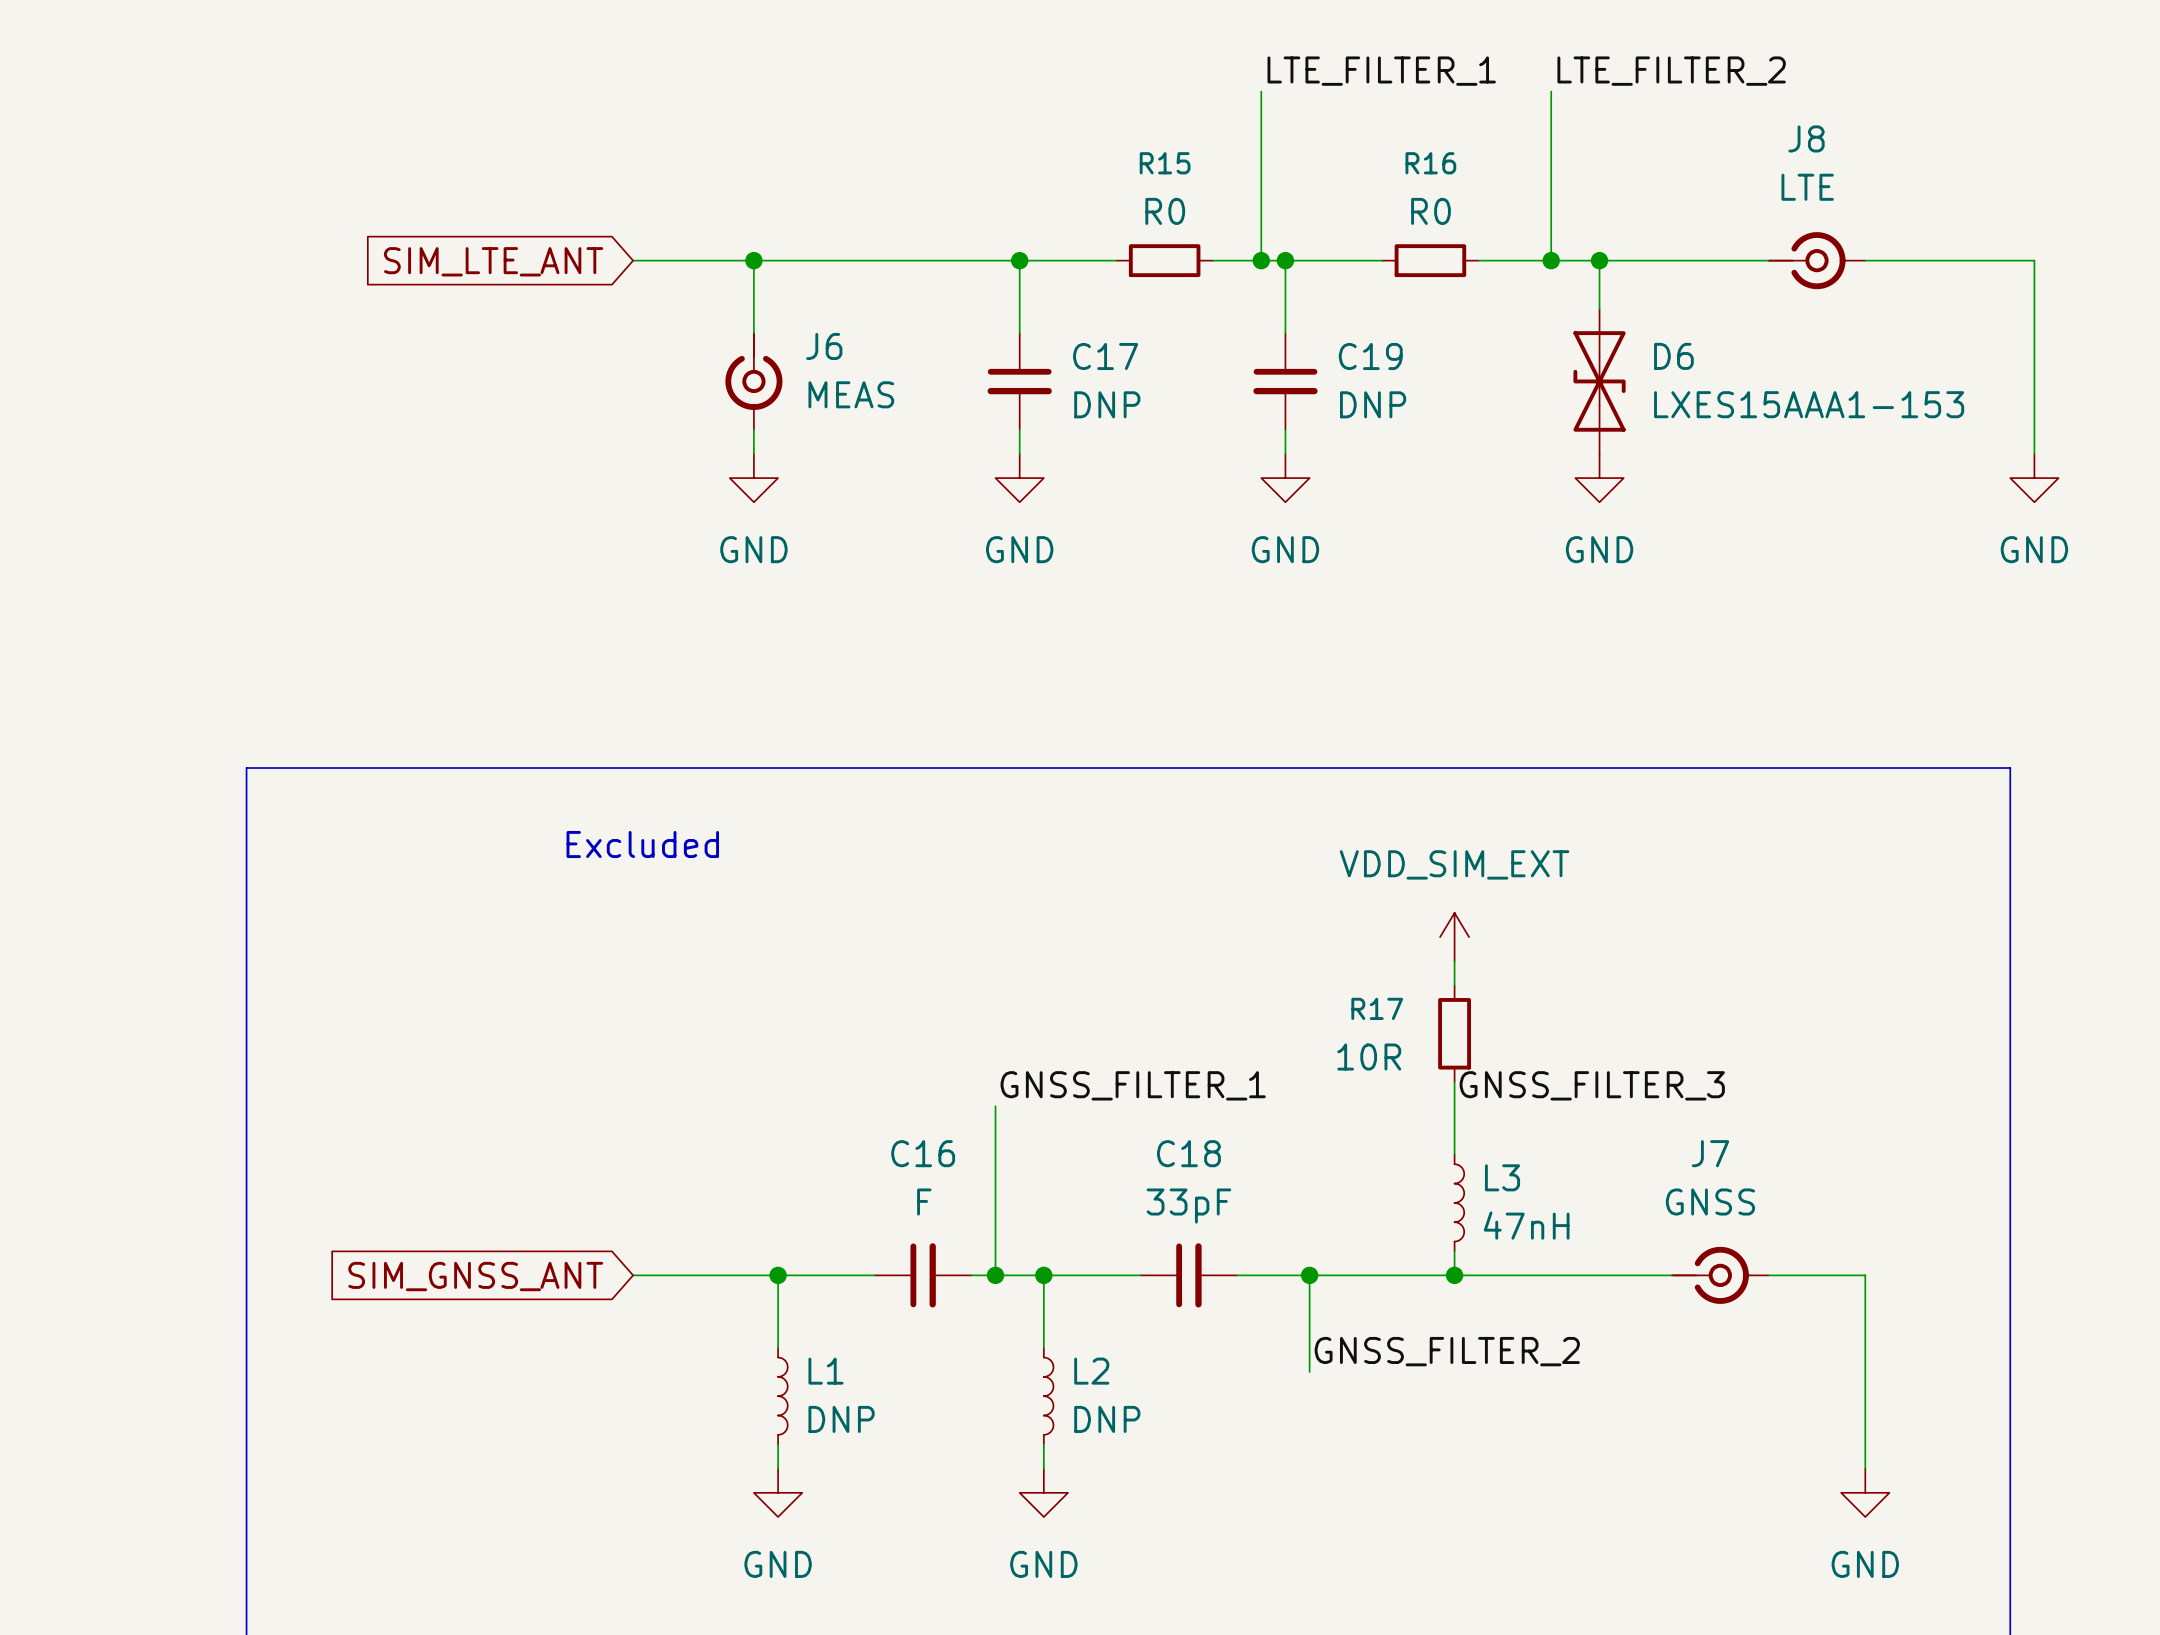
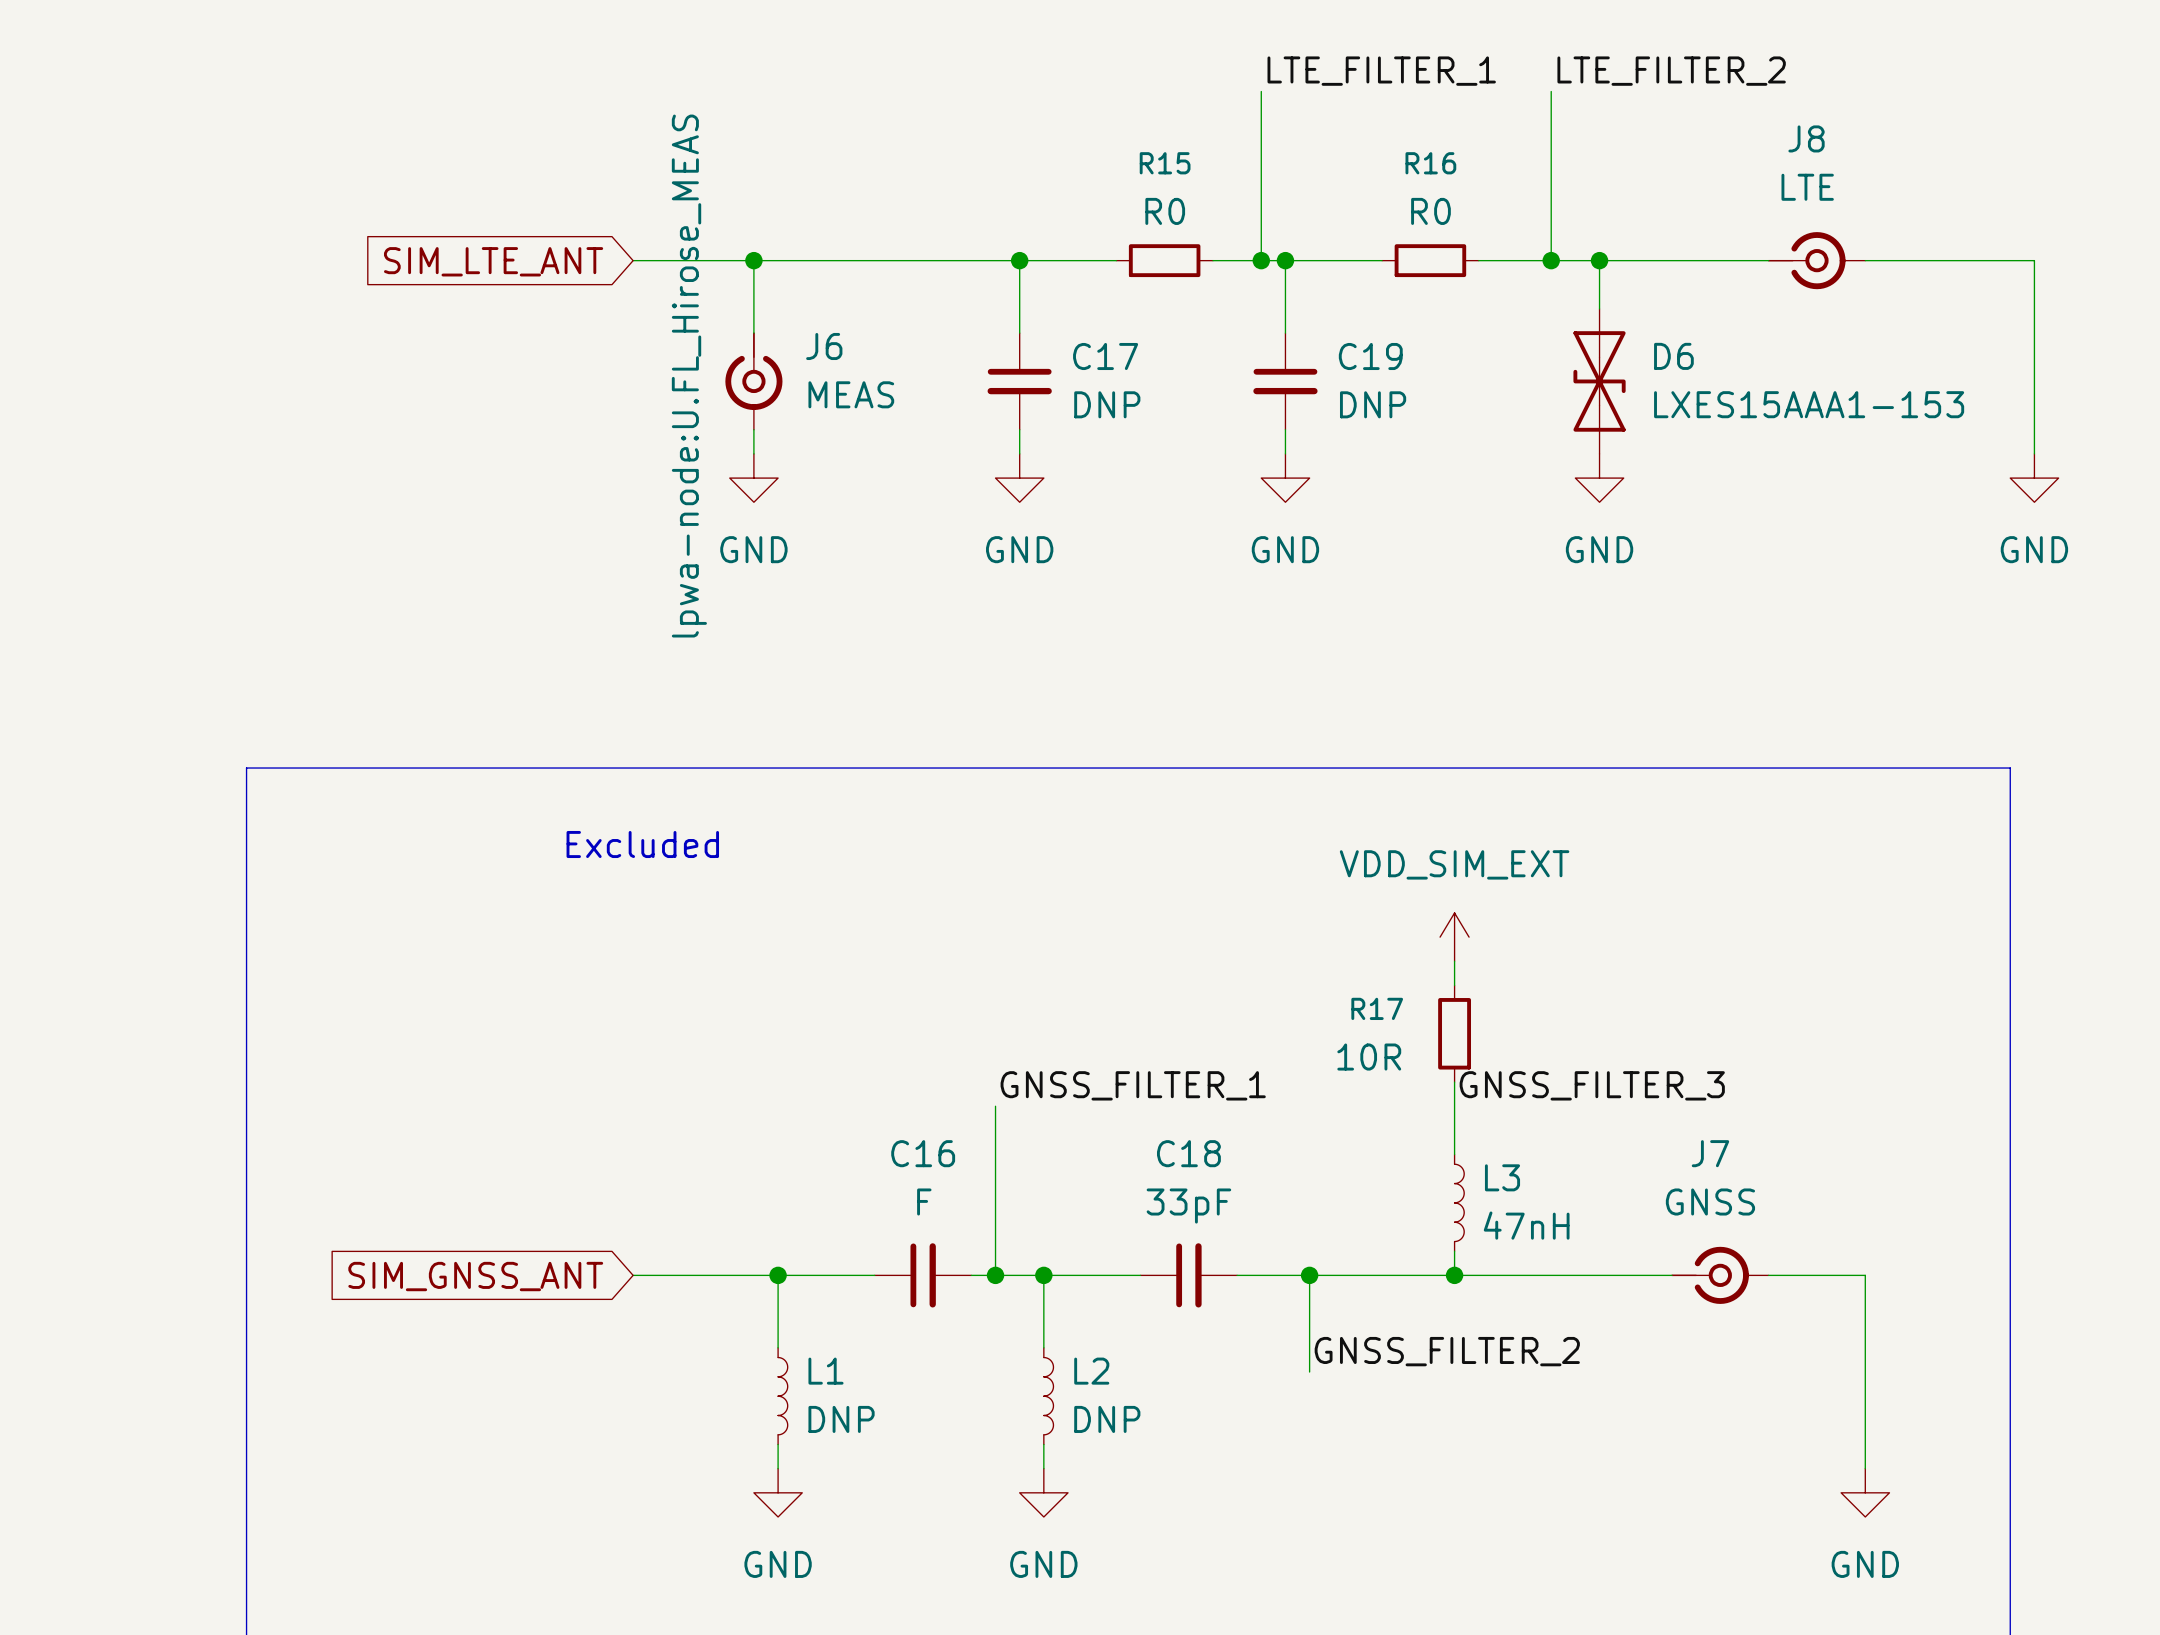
J6 text: none -> lpwa-node:U.FL_Hirose_MEAS (689, 376)

